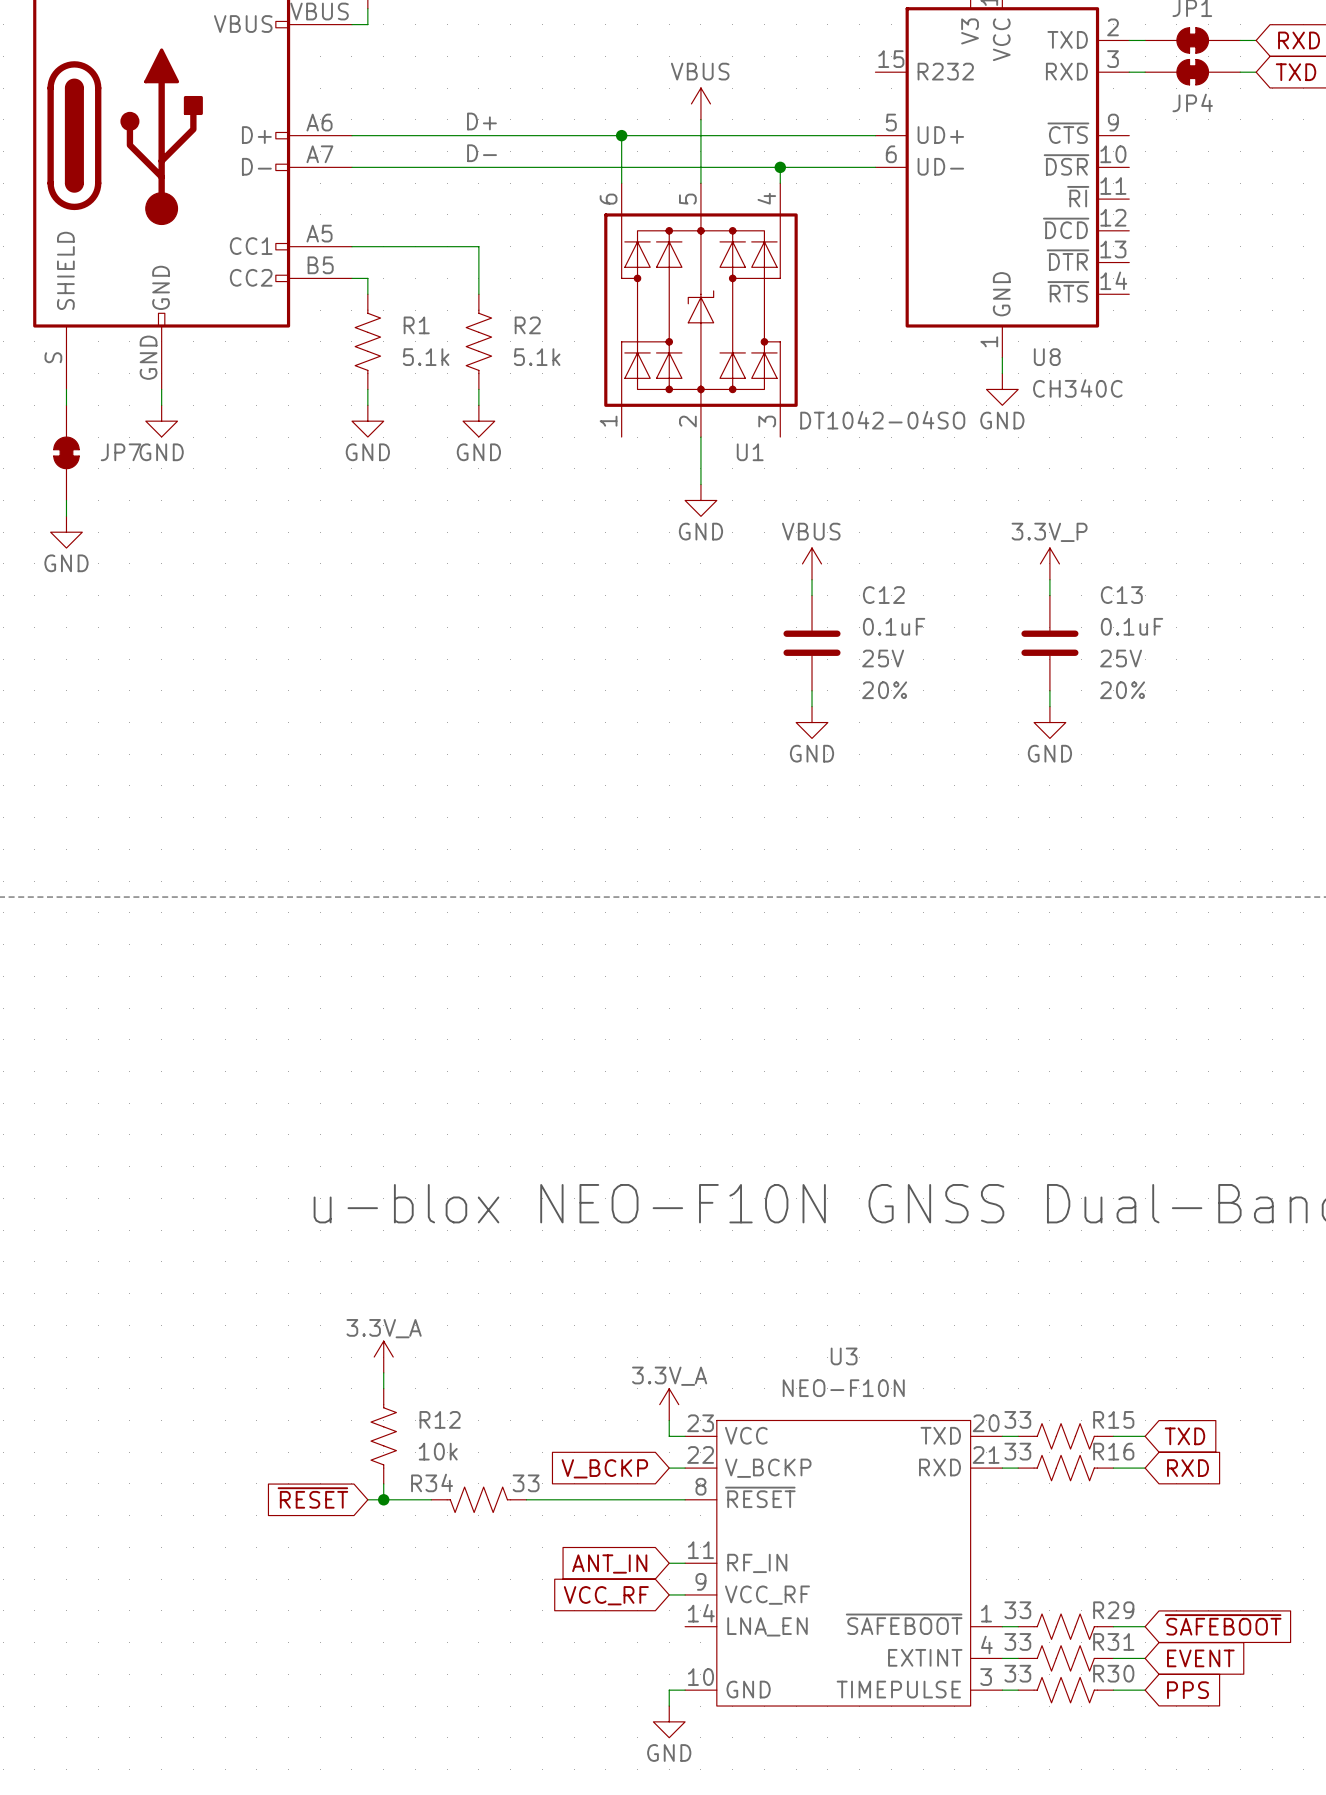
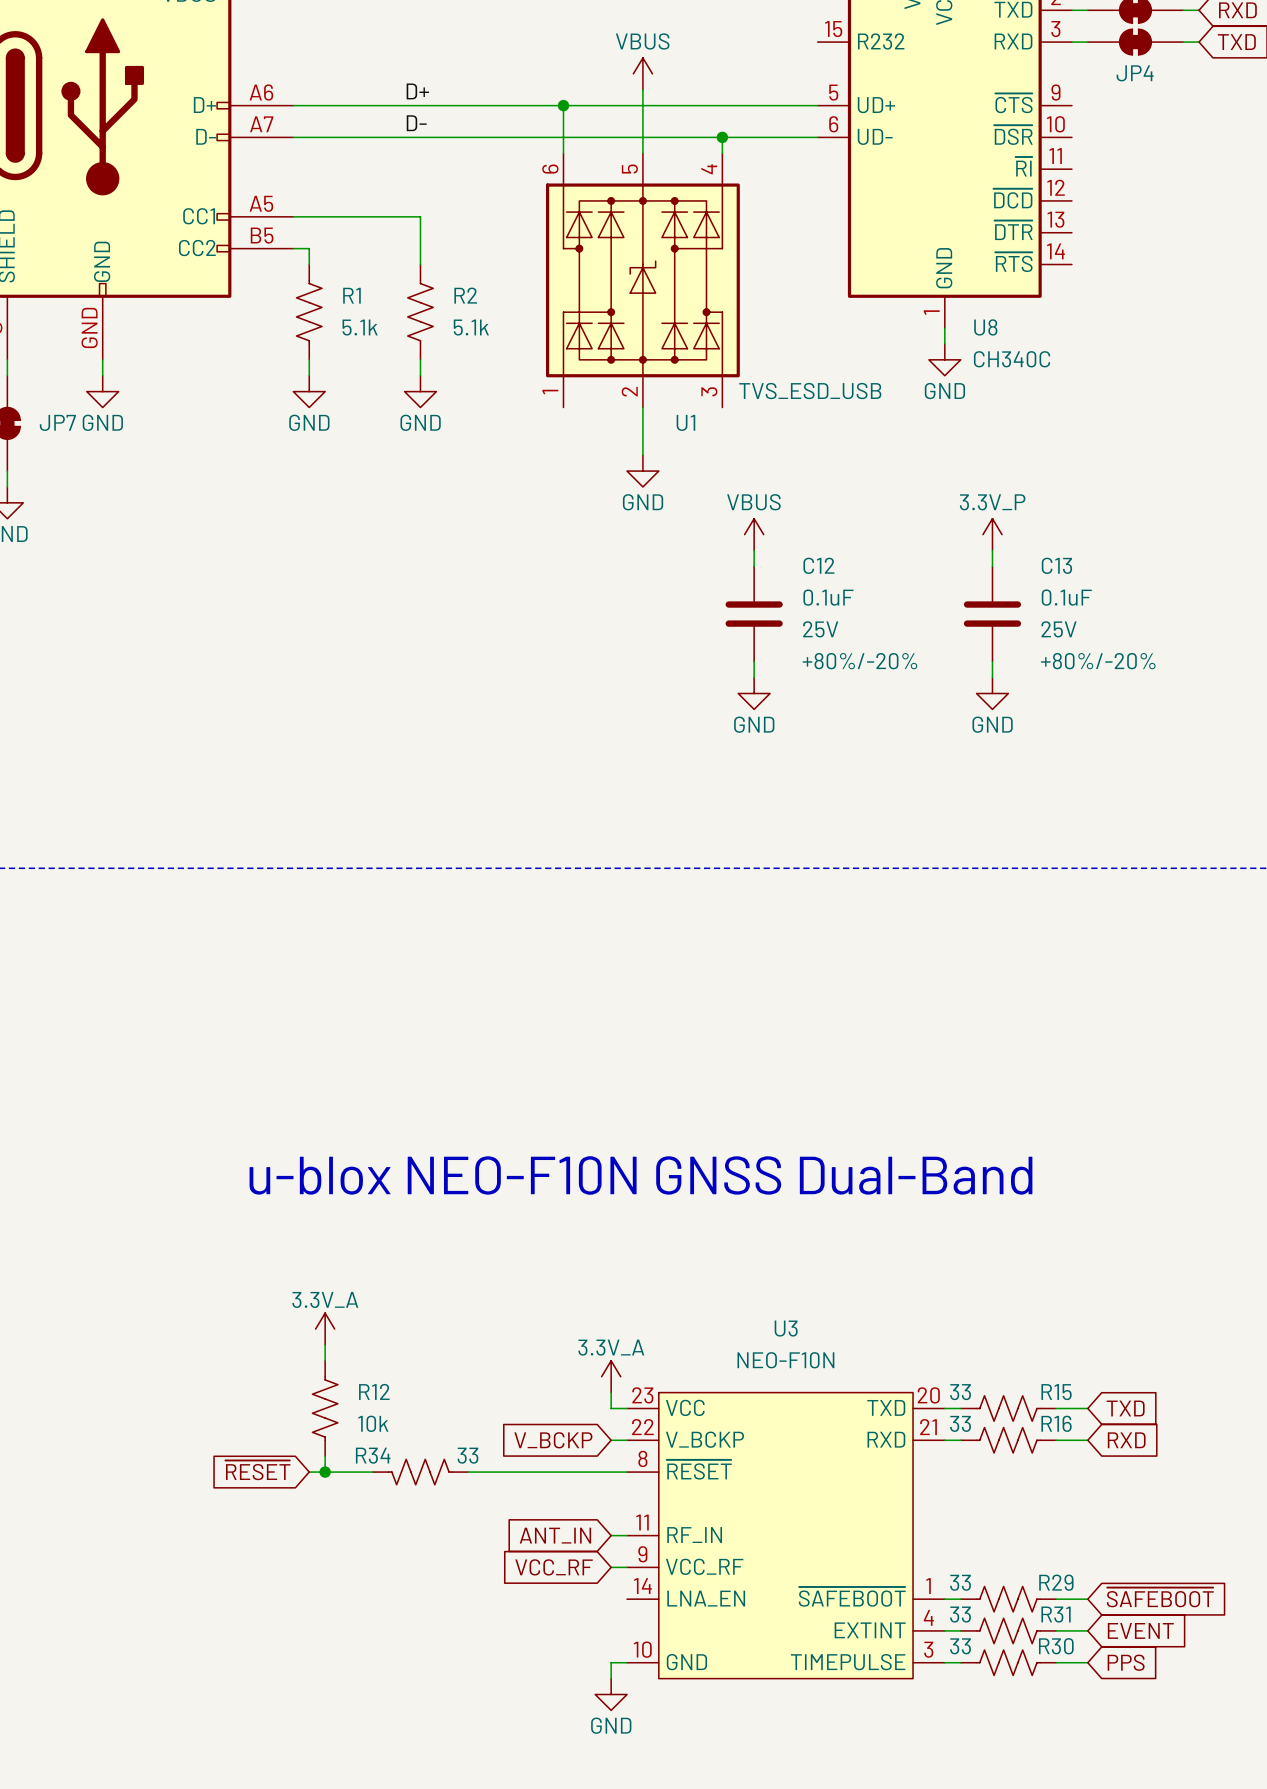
U1 value: DT1042-04SO (882, 420) -> TVS_ESD_USB (810, 391)
C12 text: 20% (884, 690) -> +80%/-20% (859, 661)
C13 text: 20% (1122, 690) -> +80%/-20% (1098, 661)

